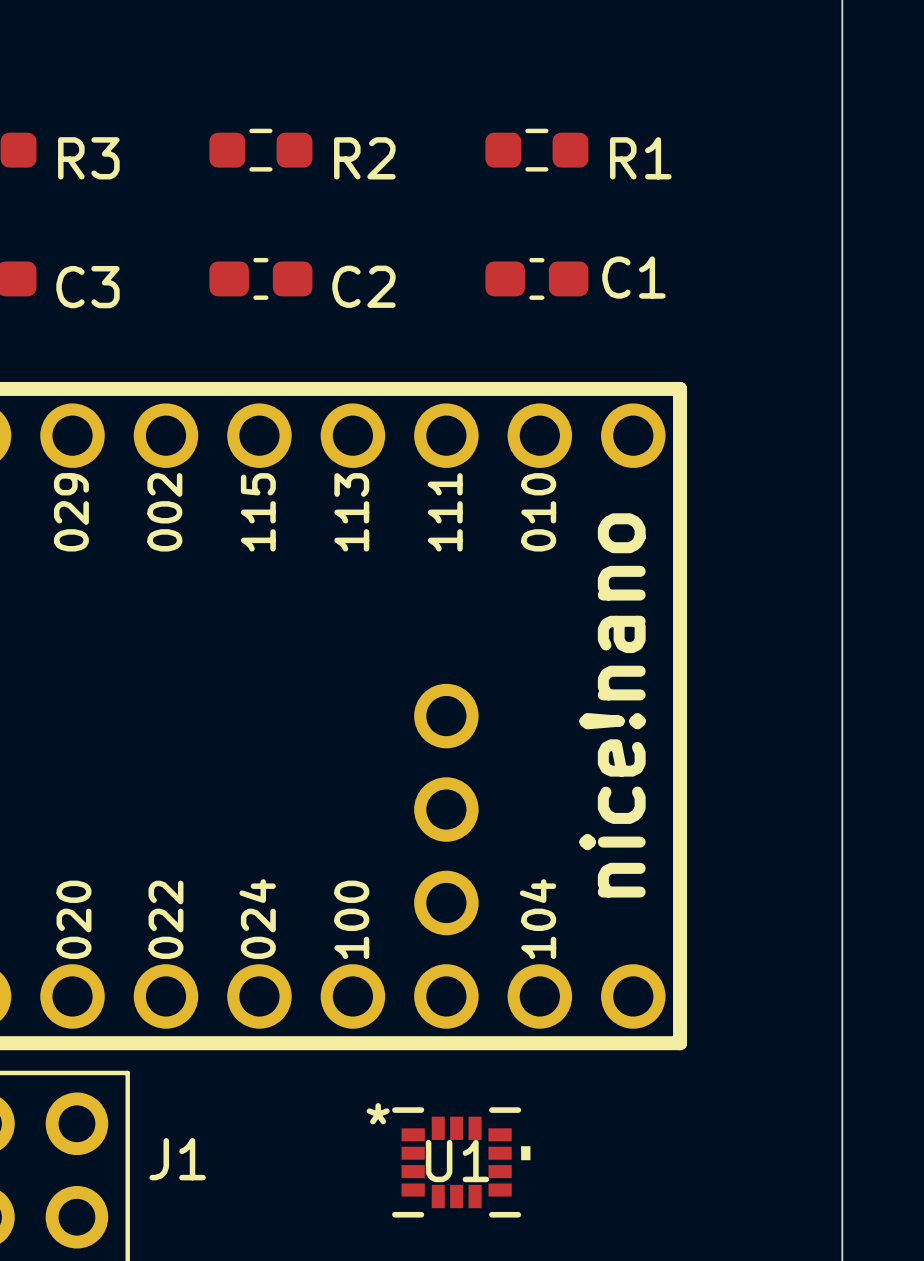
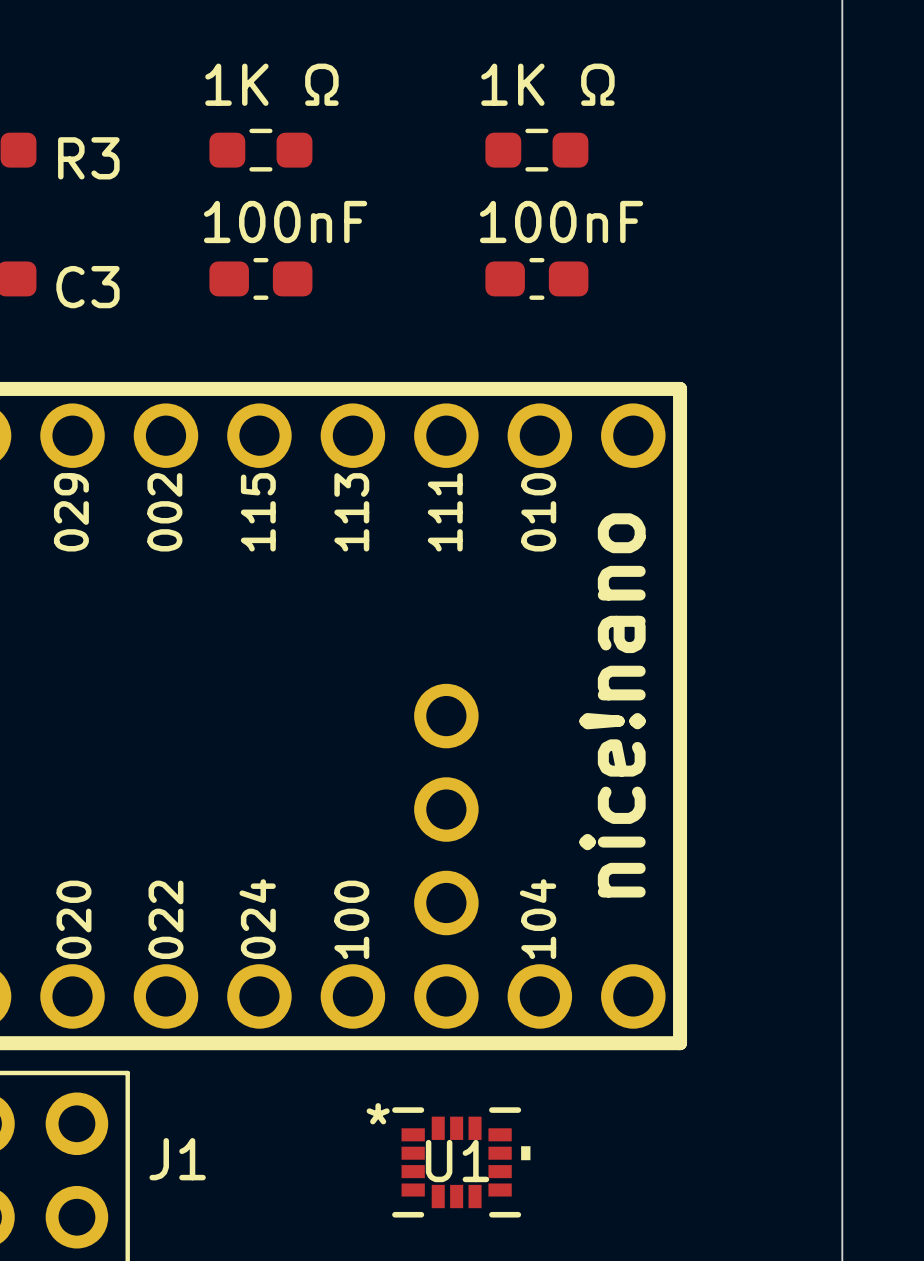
R2 name: R2 (364, 158) -> 1K Ω (271, 84)
R1 name: R1 (640, 158) -> 1K Ω (547, 84)
C1 name: C1 (633, 277) -> 100nF (561, 221)
C2 name: C2 (363, 286) -> 100nF (285, 221)

